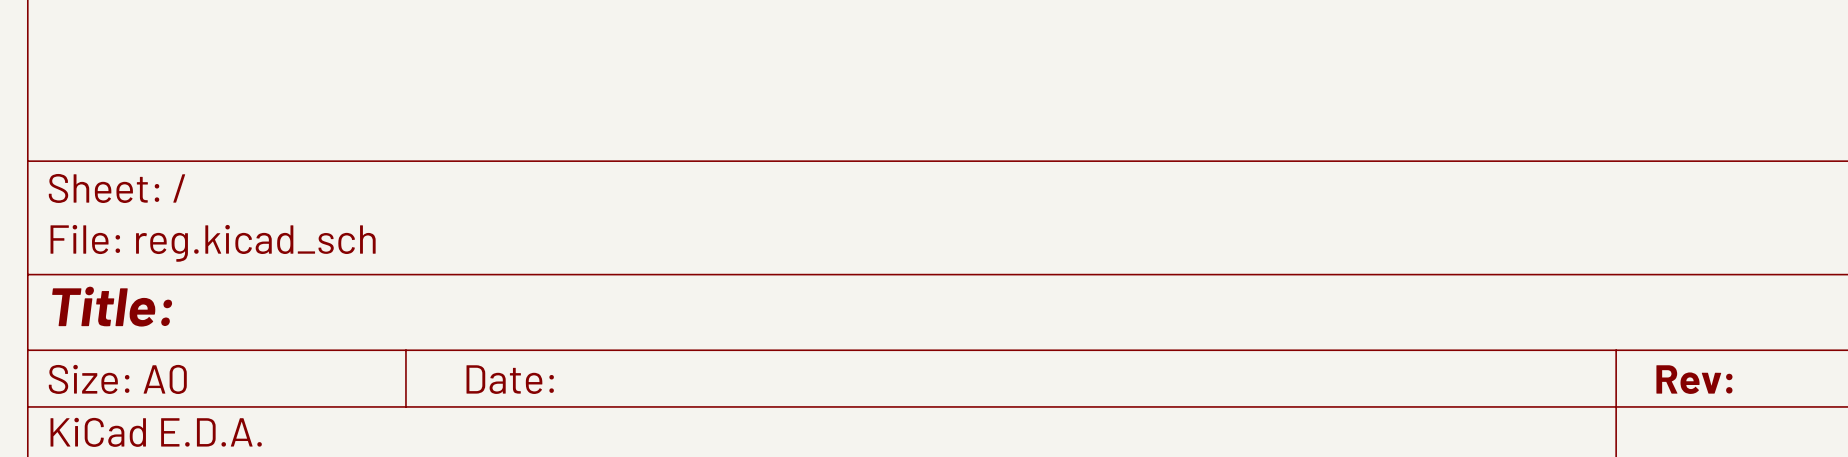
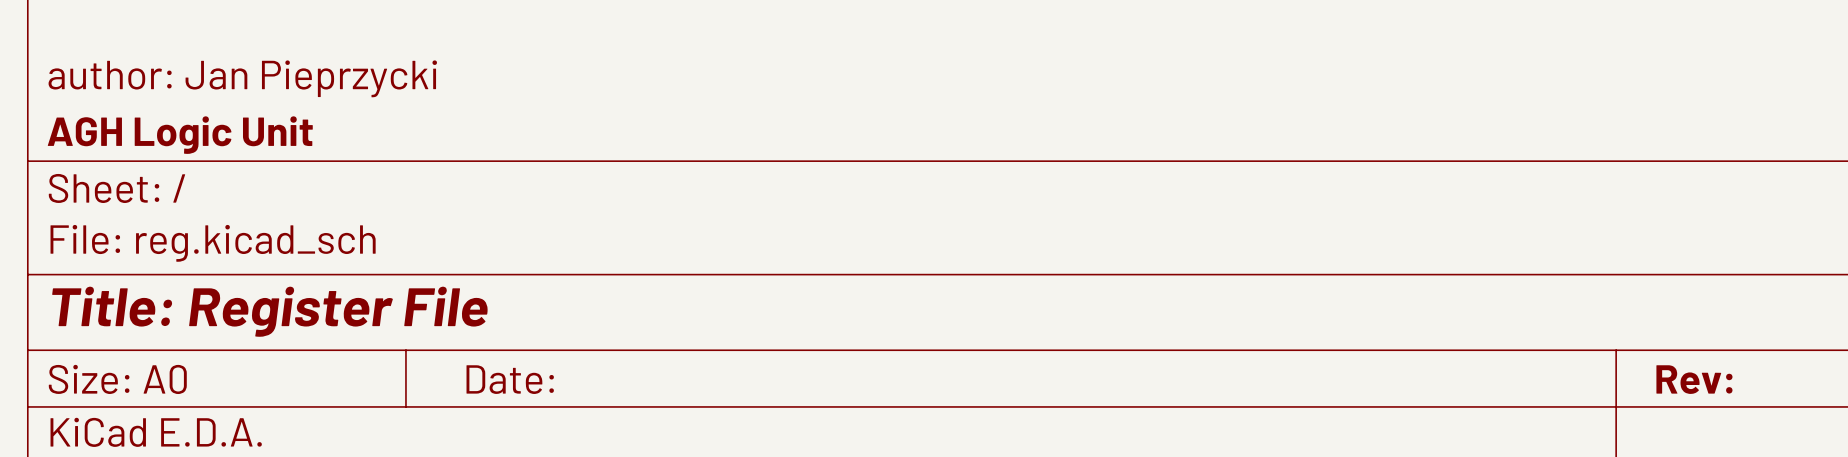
title block: none -> author: Jan Pieprzycki (242, 78)
title block: none -> AGH Logic Unit (180, 135)
title block: Title: (112, 306) -> Title: Register File (269, 311)

